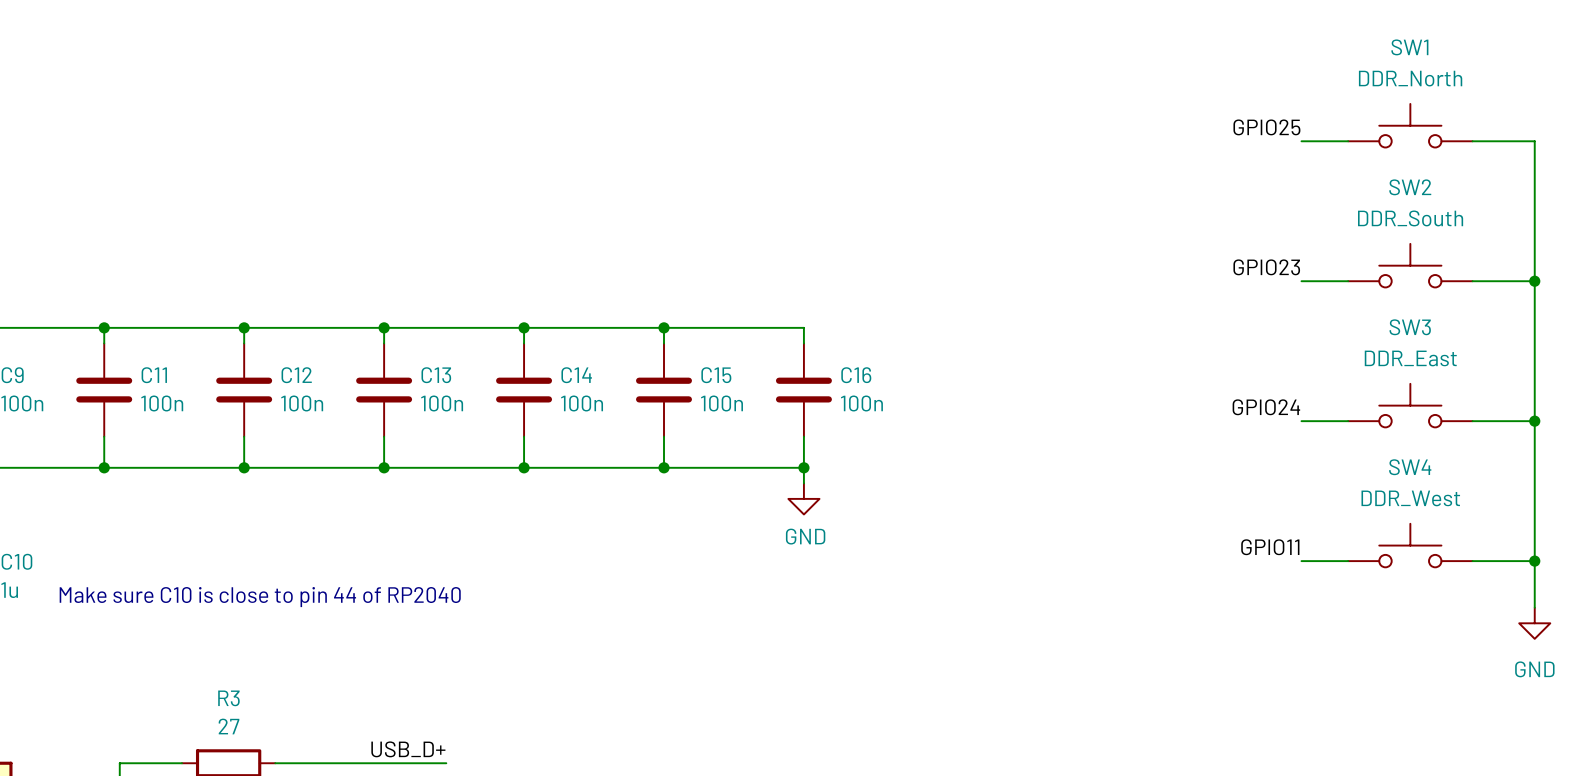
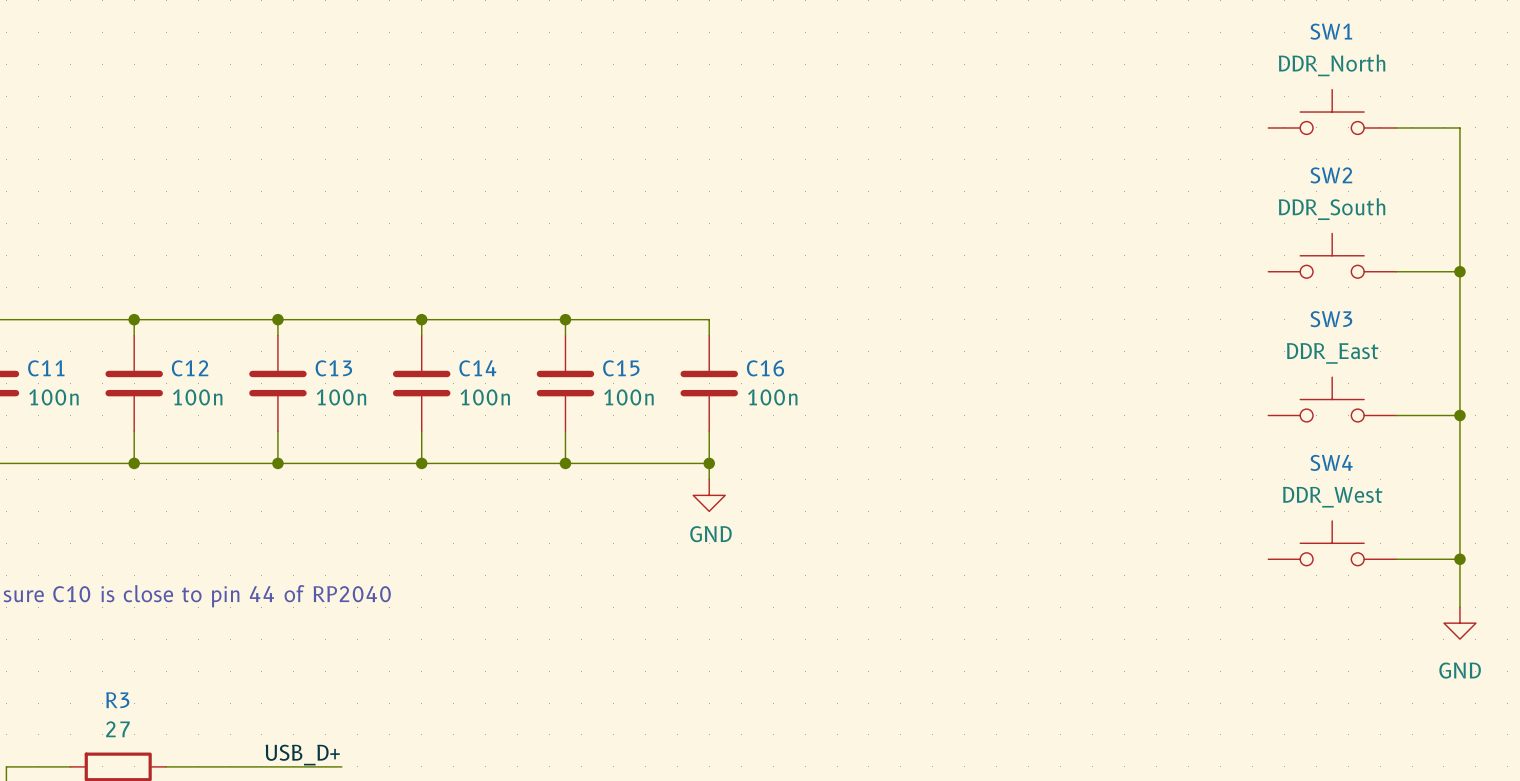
label: GPIO25 (1266, 127) -> none
wire: (1301, 141) (1348, 141) -> none
label: GPIO23 (1266, 267) -> none
wire: (1301, 281) (1348, 281) -> none
label: GPIO24 (1266, 407) -> none
wire: (1301, 421) (1348, 421) -> none
label: GPIO11 (1270, 547) -> none
wire: (1301, 561) (1348, 561) -> none

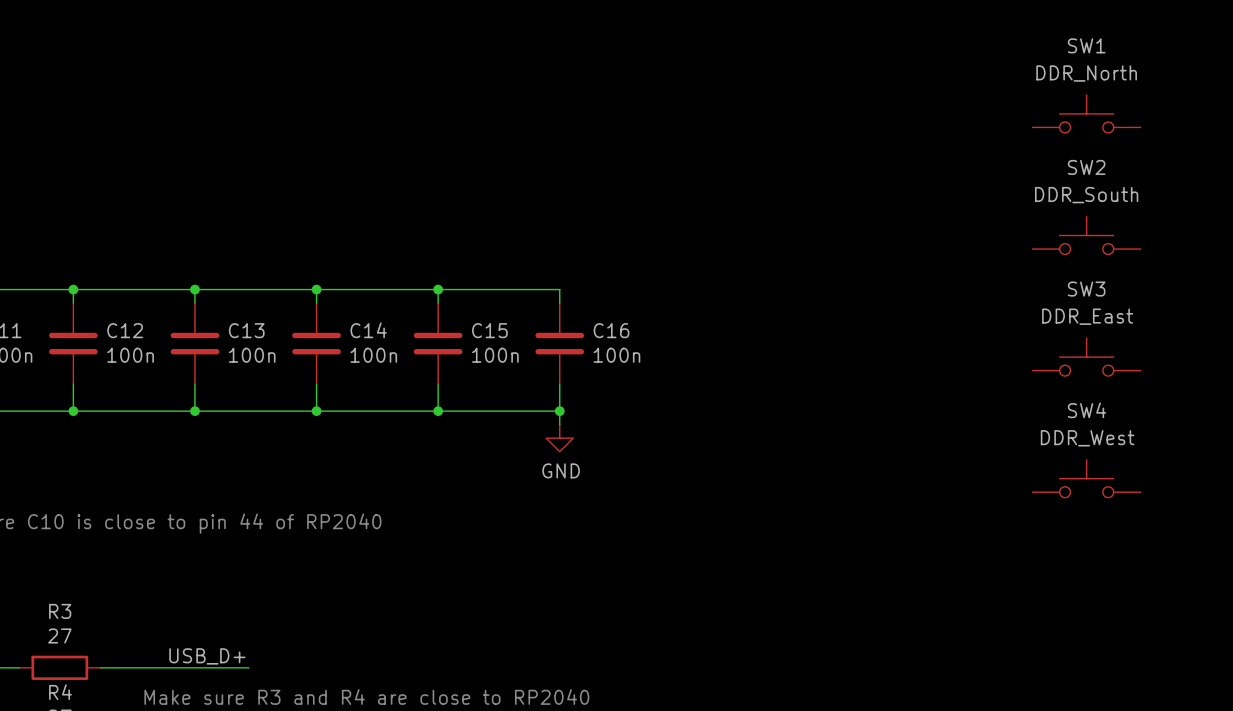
wire: (1396, 127) (1459, 127) (1459, 607) -> none
wire: (1396, 271) (1459, 271) -> none
junction: (1459, 271) -> none
wire: (1396, 415) (1459, 415) -> none
junction: (1459, 415) -> none
wire: (1396, 559) (1459, 559) -> none
junction: (1459, 559) -> none
power symbol: GND (1459, 623) -> none

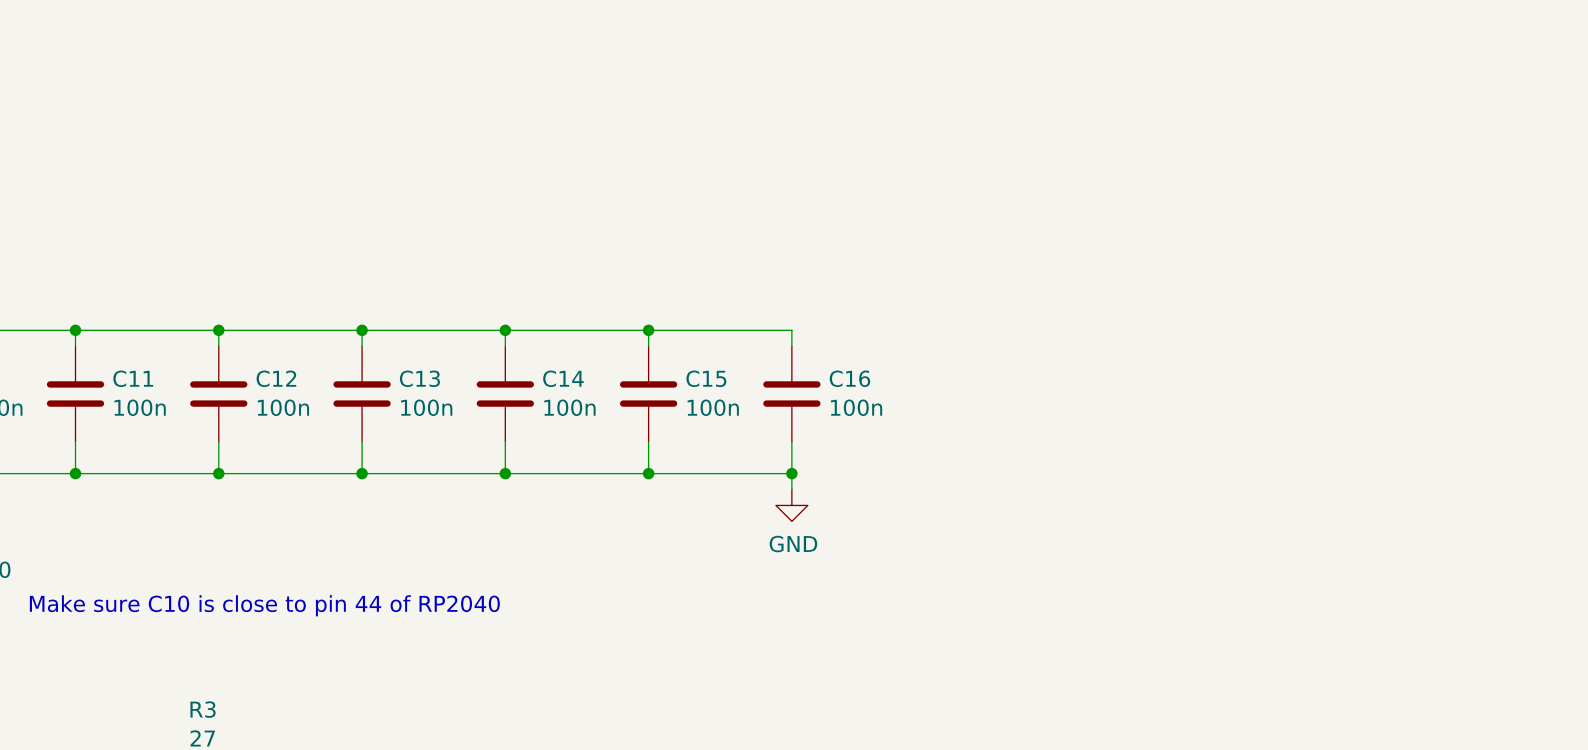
SW1: DDR_North (1086, 113) -> none
SW2: DDR_South (1086, 235) -> none
SW3: DDR_East (1086, 357) -> none
SW4: DDR_West (1086, 478) -> none

